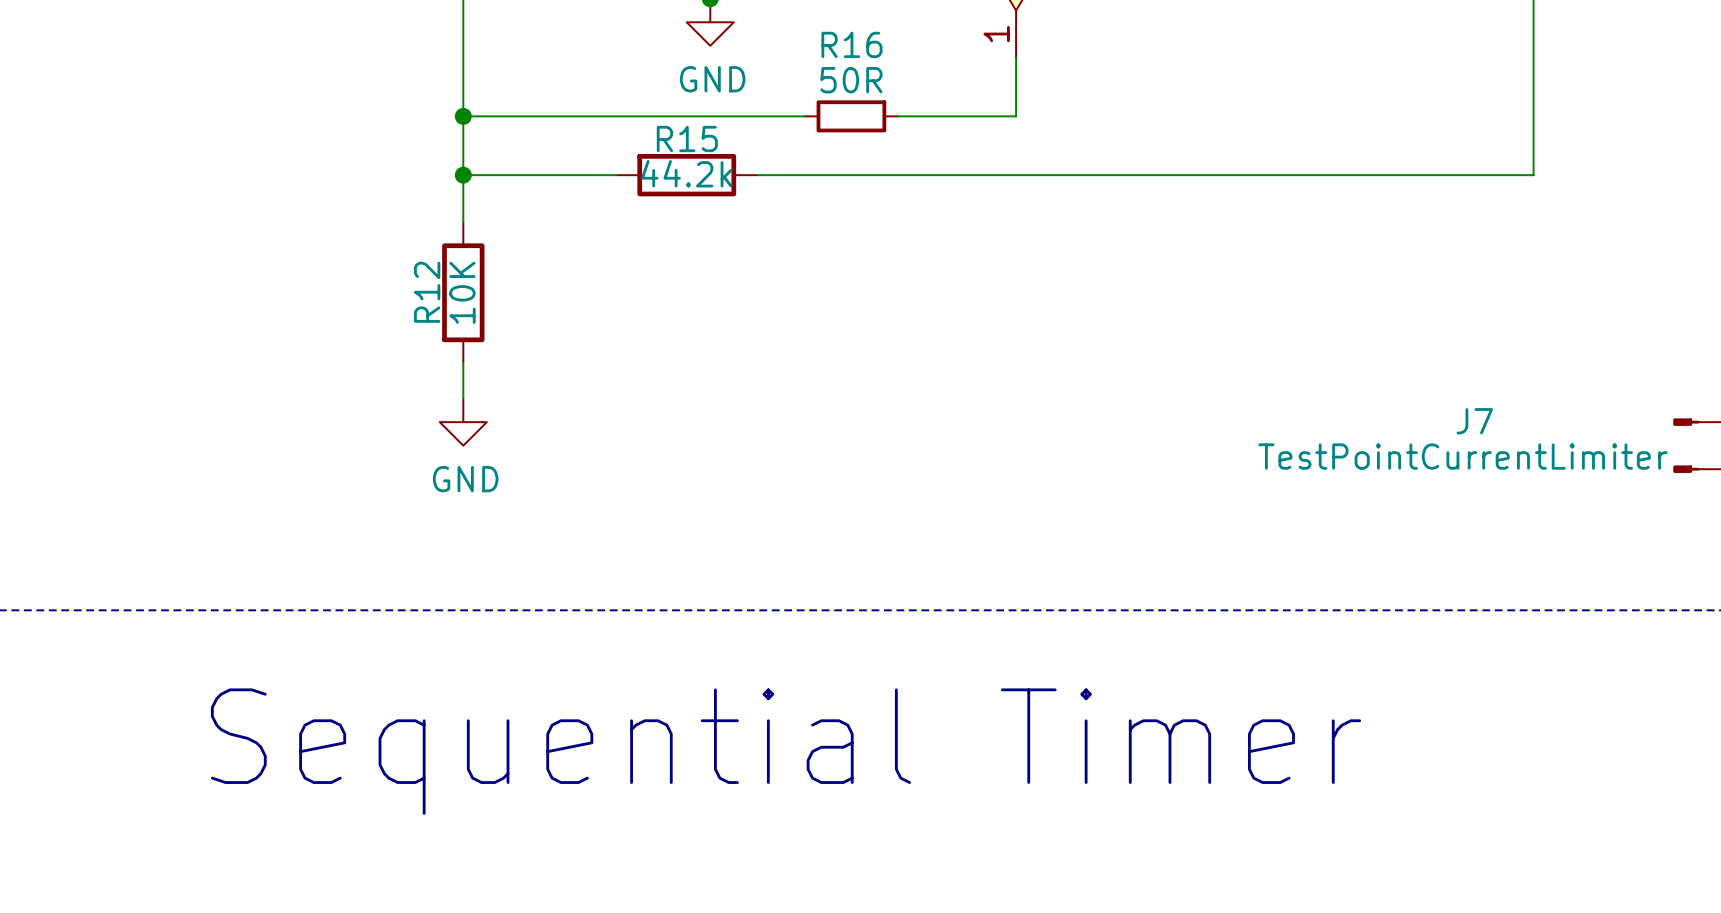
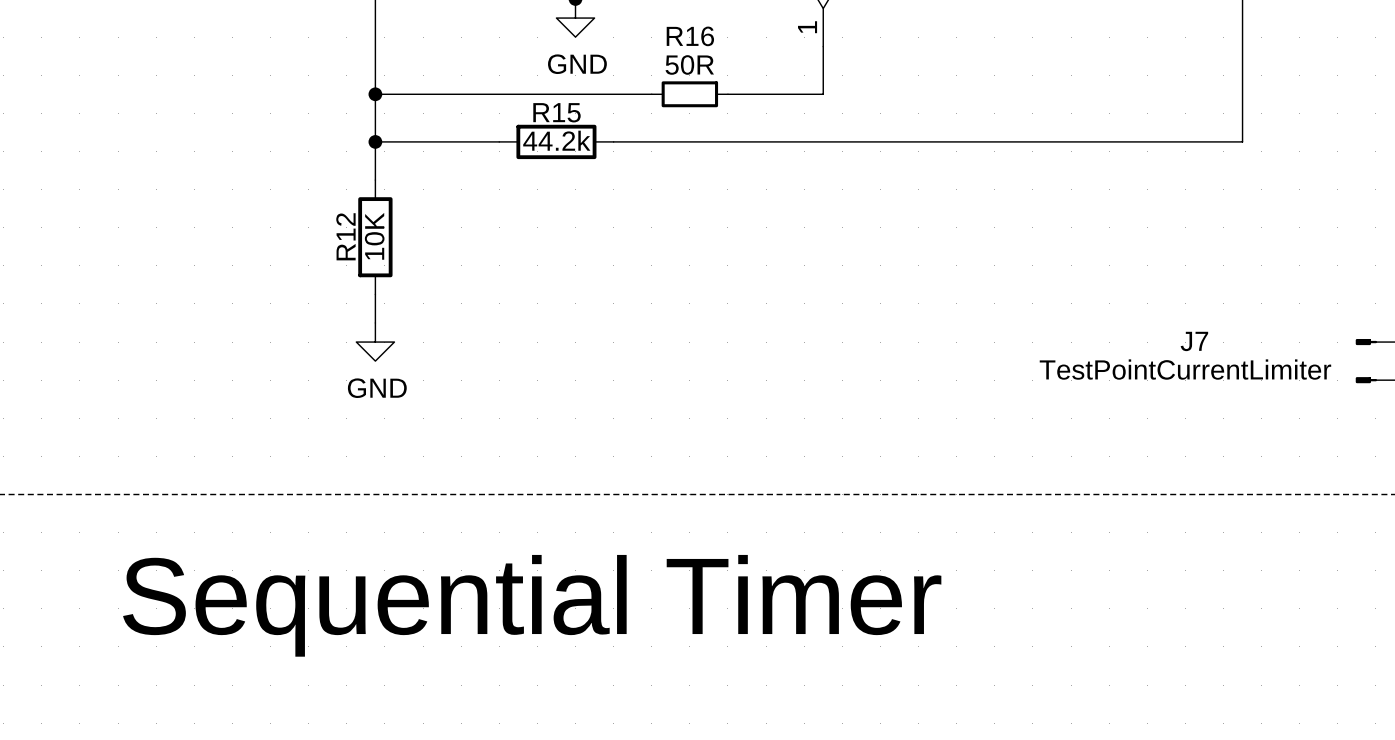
text position: Sequential Timer (786, 751) -> Sequential Timer (532, 605)

